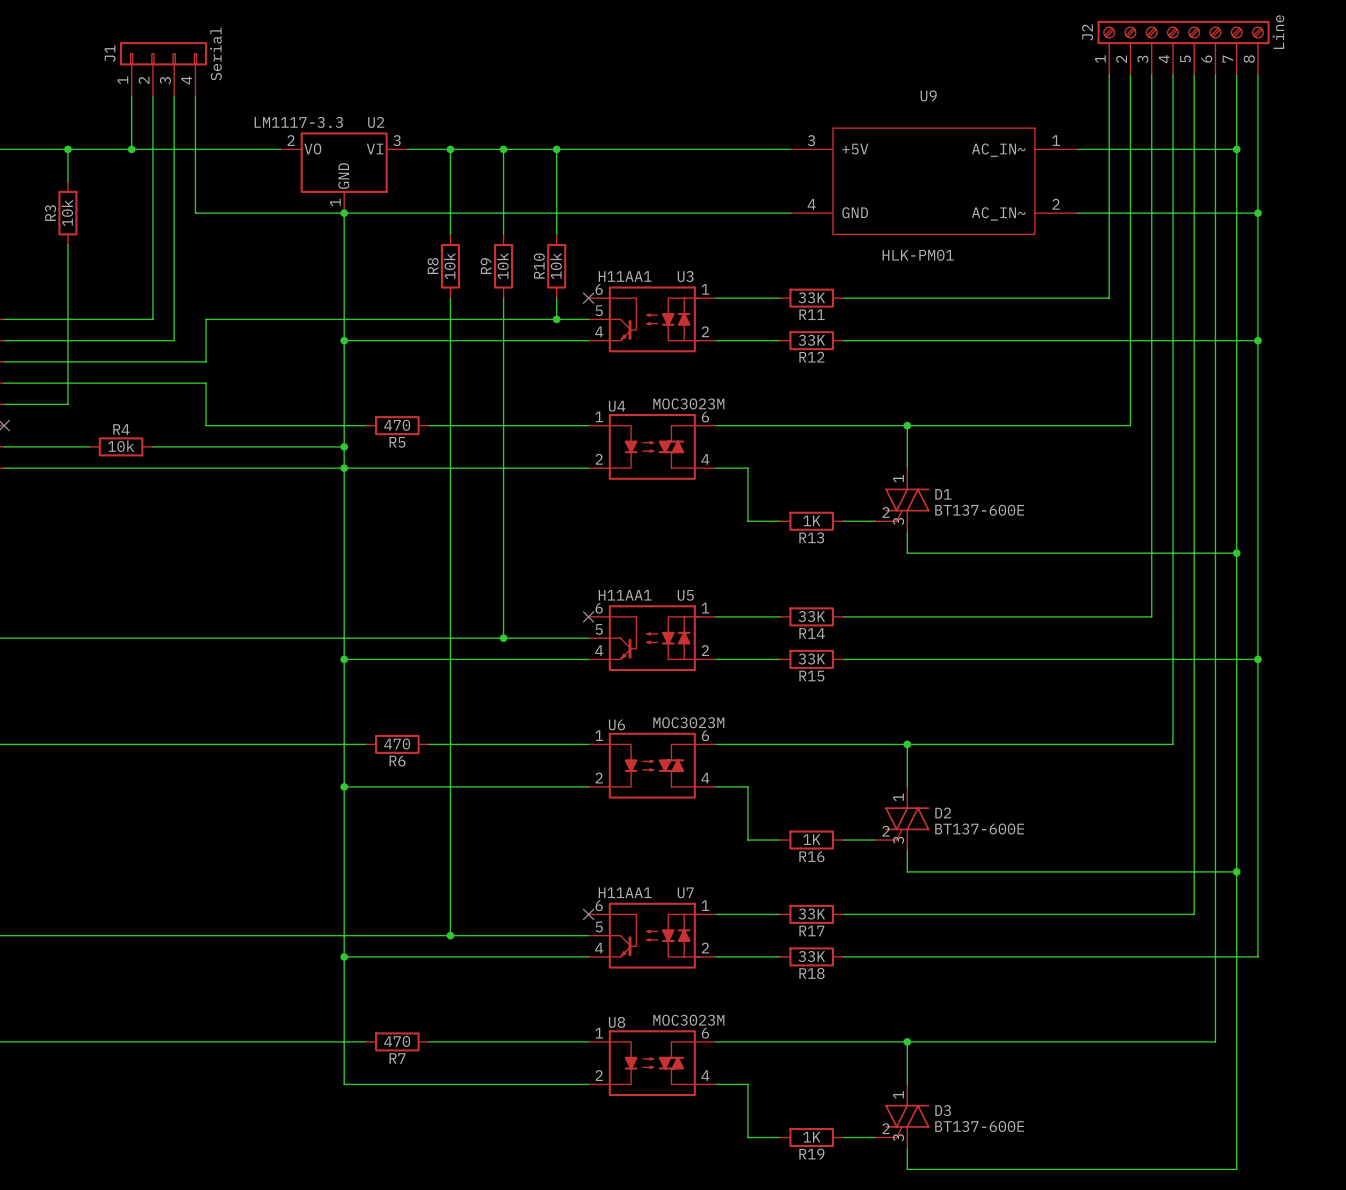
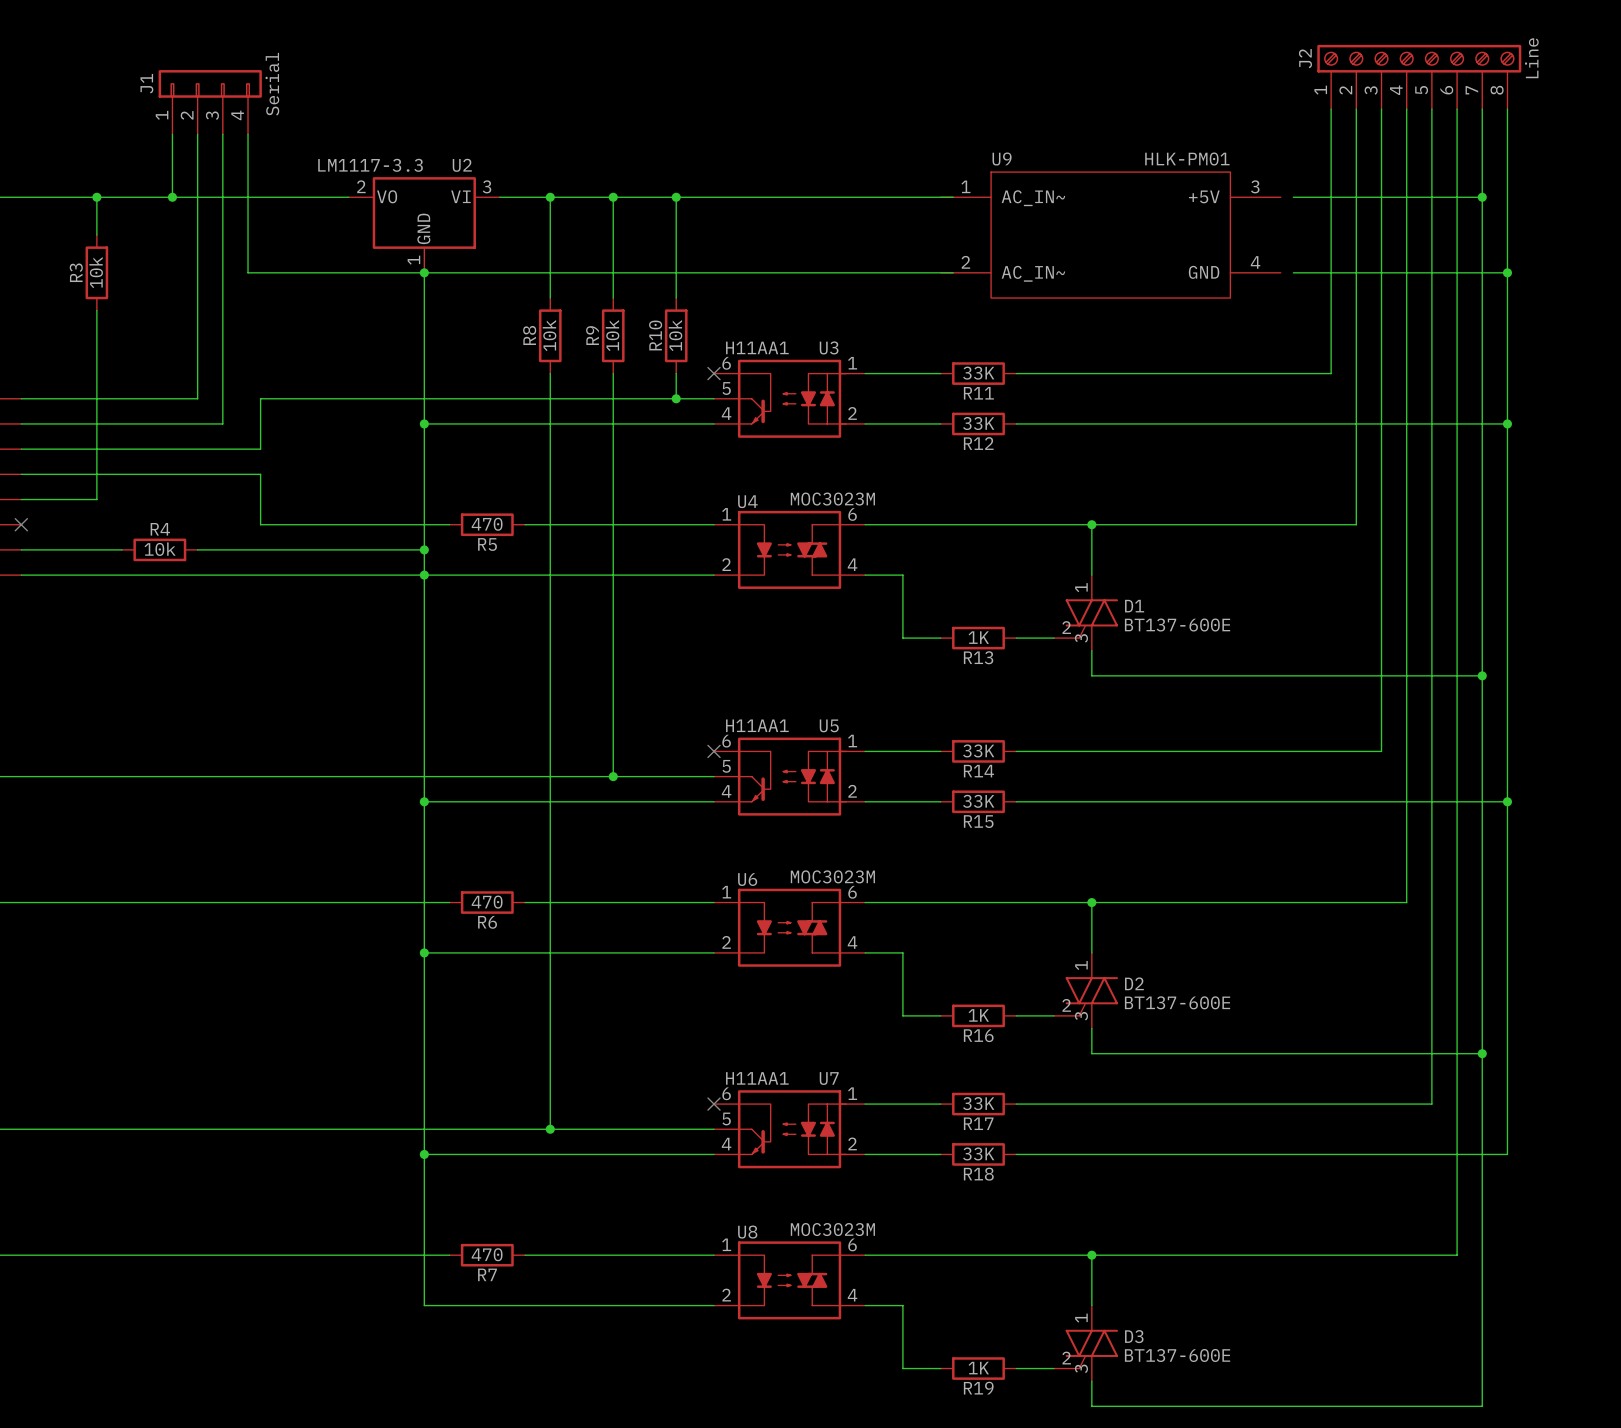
U9 name position: U9 (928, 95) -> U9 (1002, 159)
U9 flip: as is (933, 181) -> left-right (1110, 235)
U9 value position: HLK-PM01 (918, 255) -> HLK-PM01 (1187, 159)

